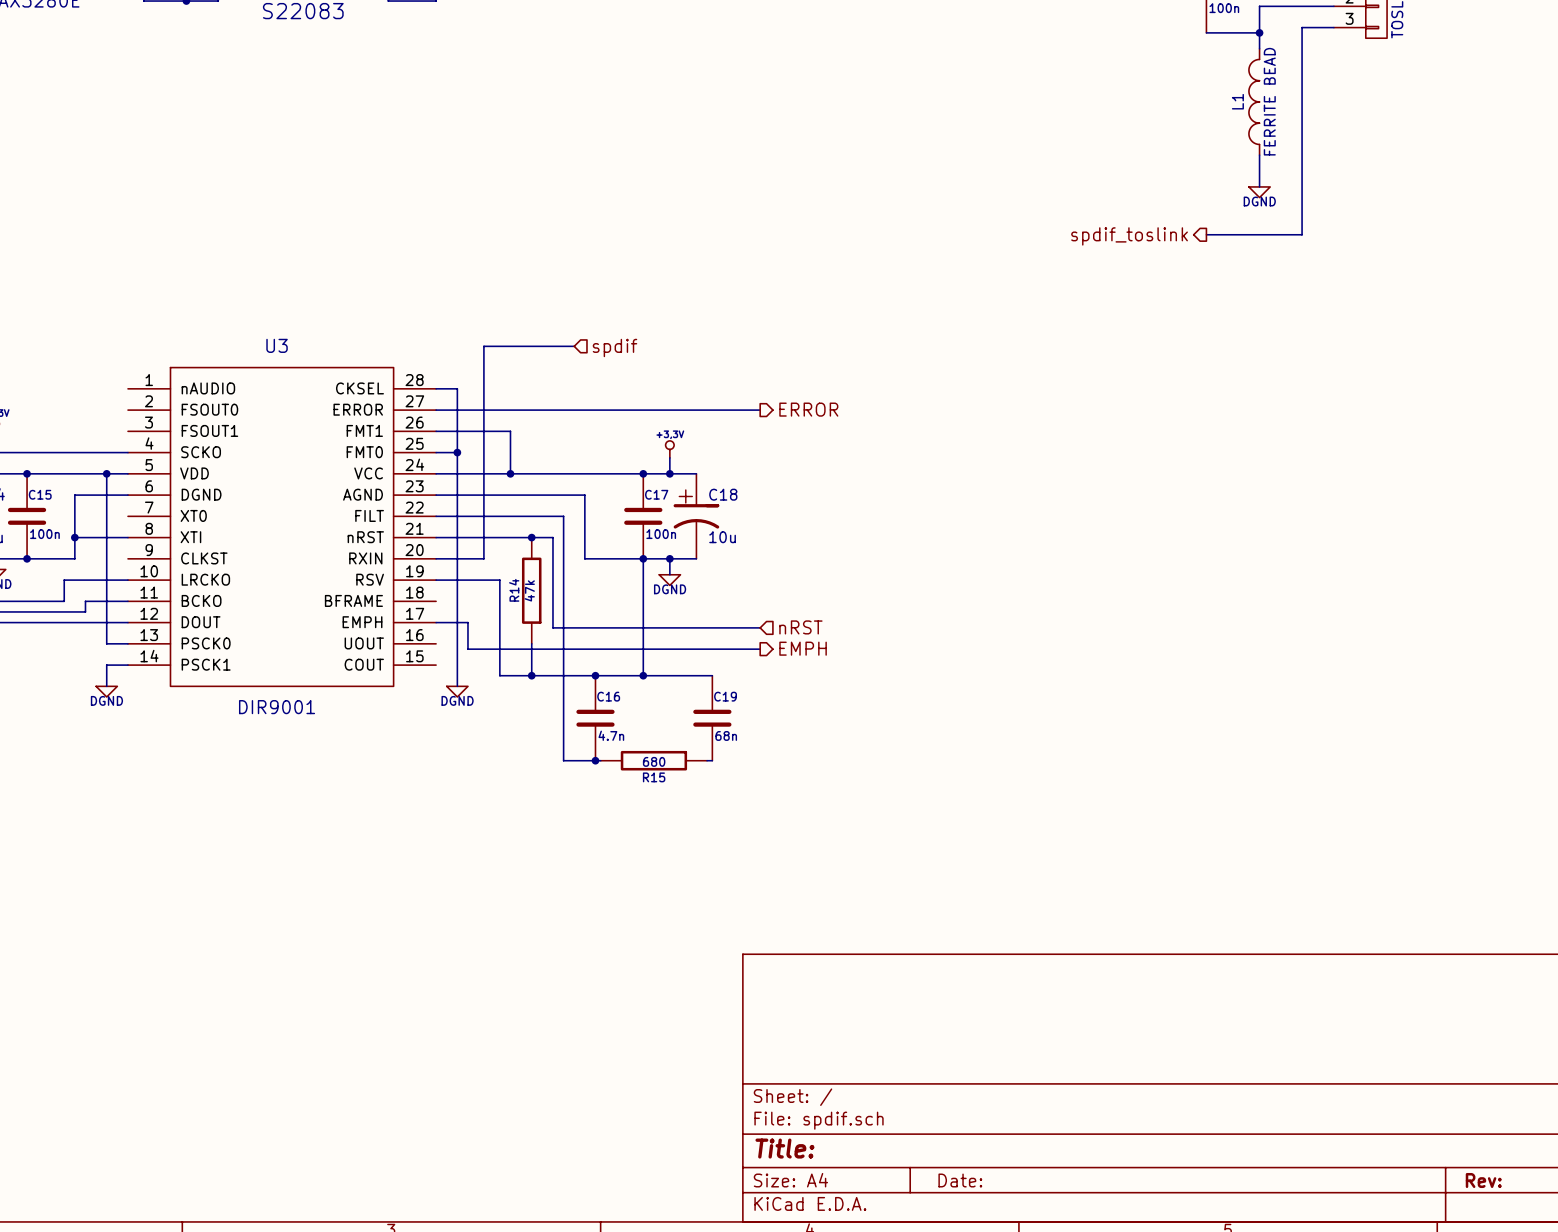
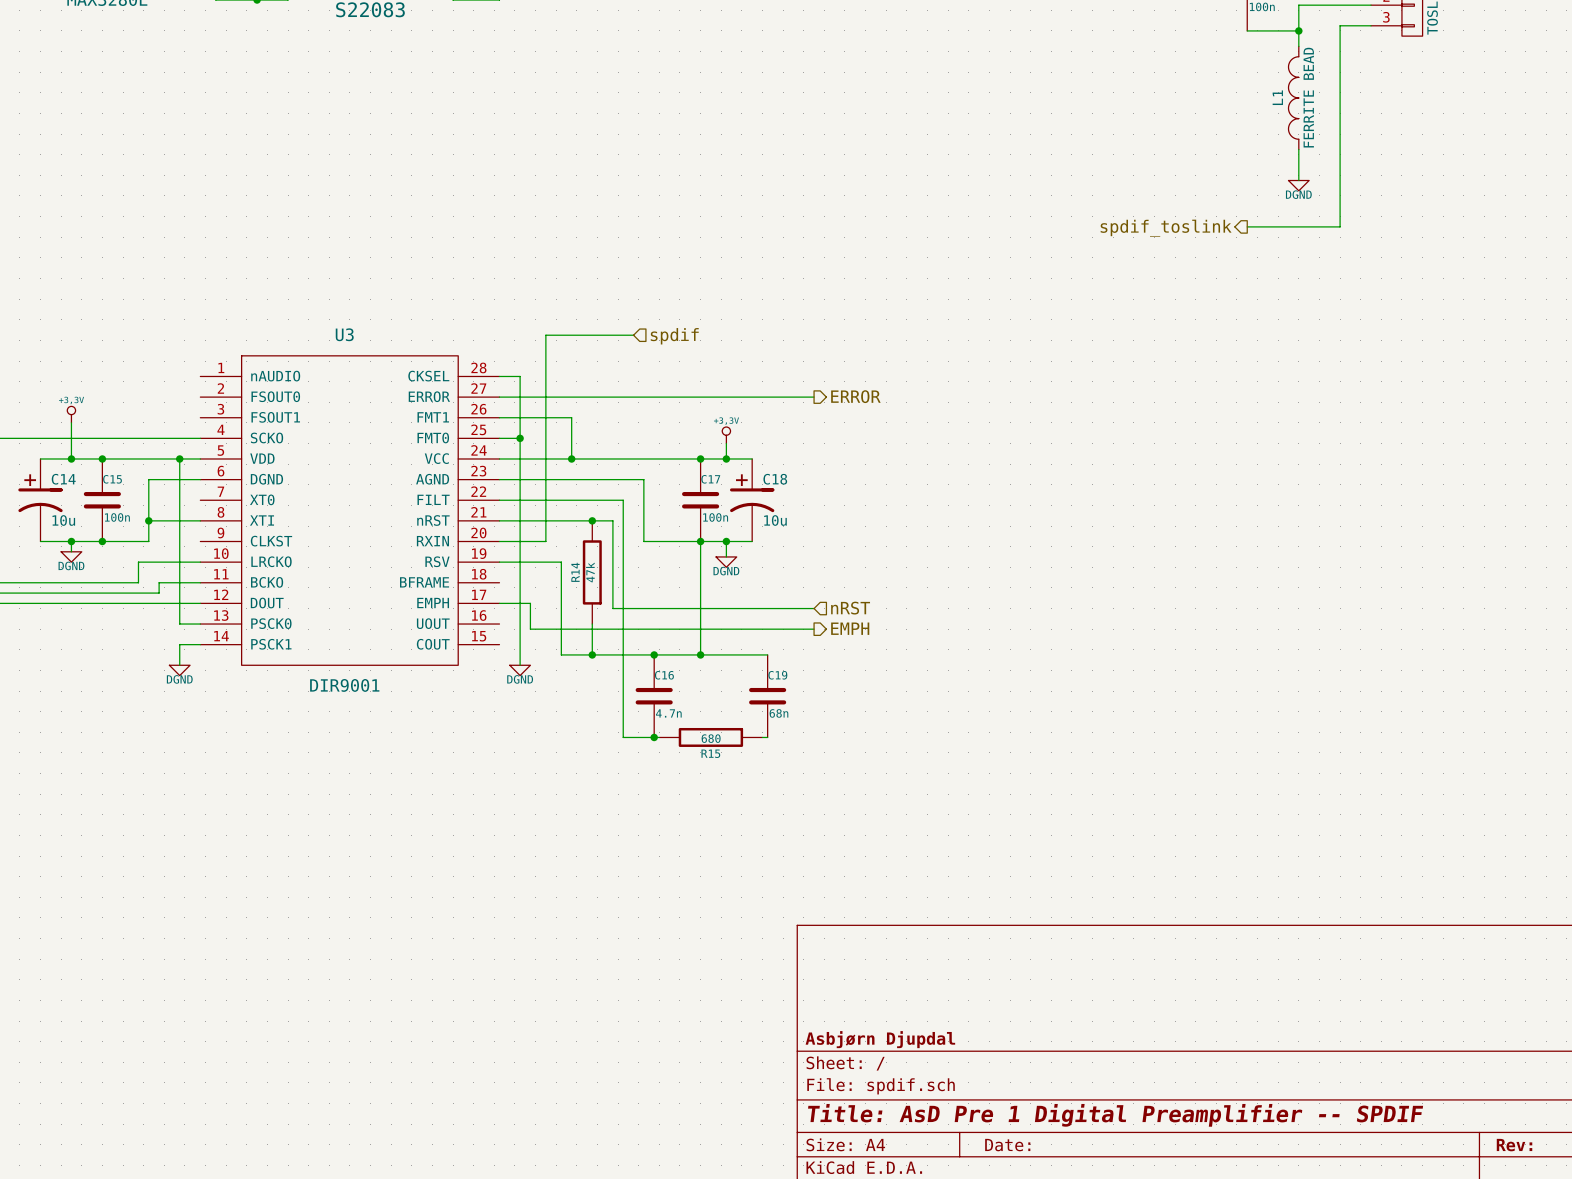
title block: none -> Asbjørn Djupdal (880, 1039)
title block: Title: (784, 1148) -> Title: AsD Pre 1 Digital Preamplifier -- SPDIF (1115, 1115)

